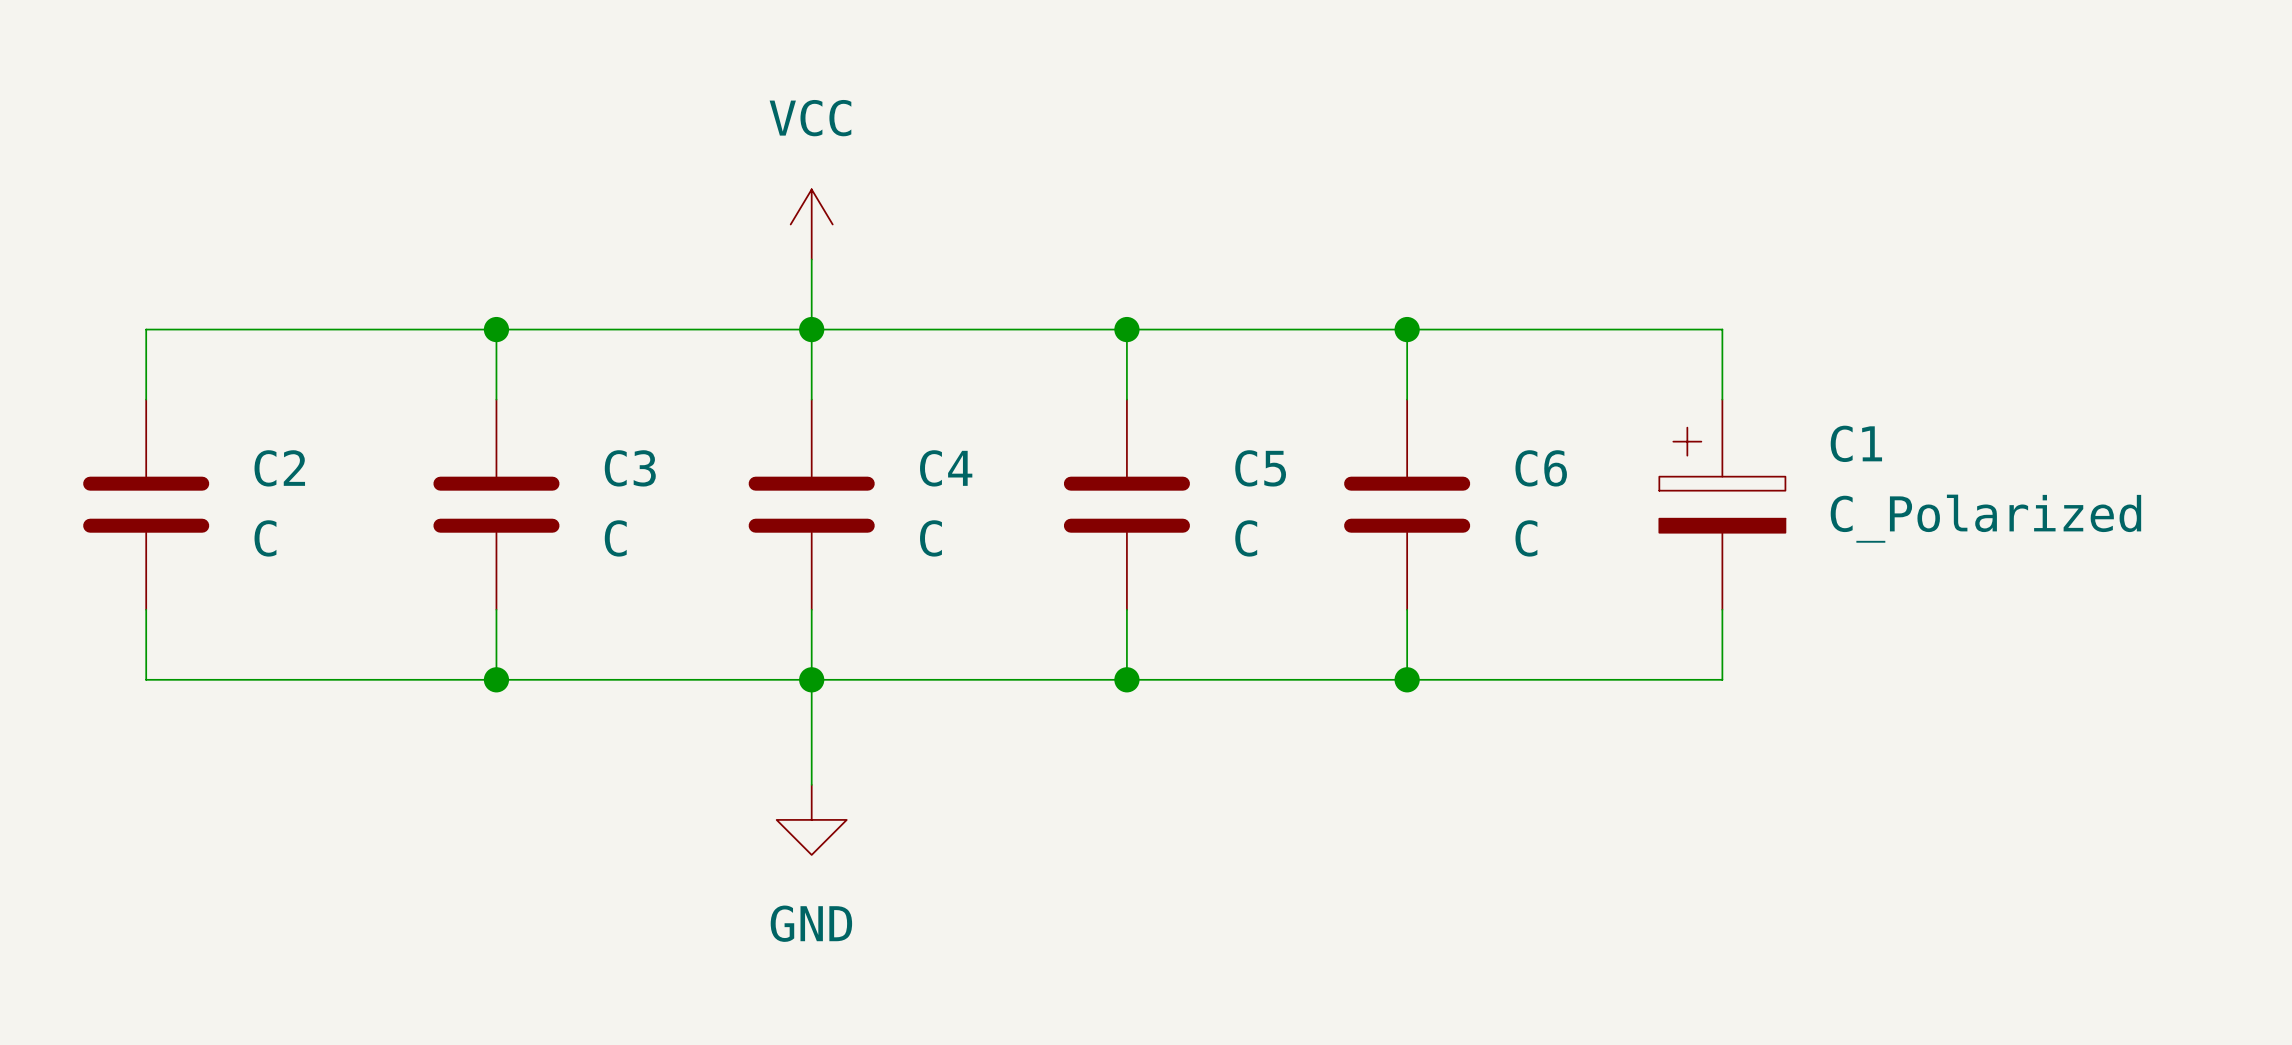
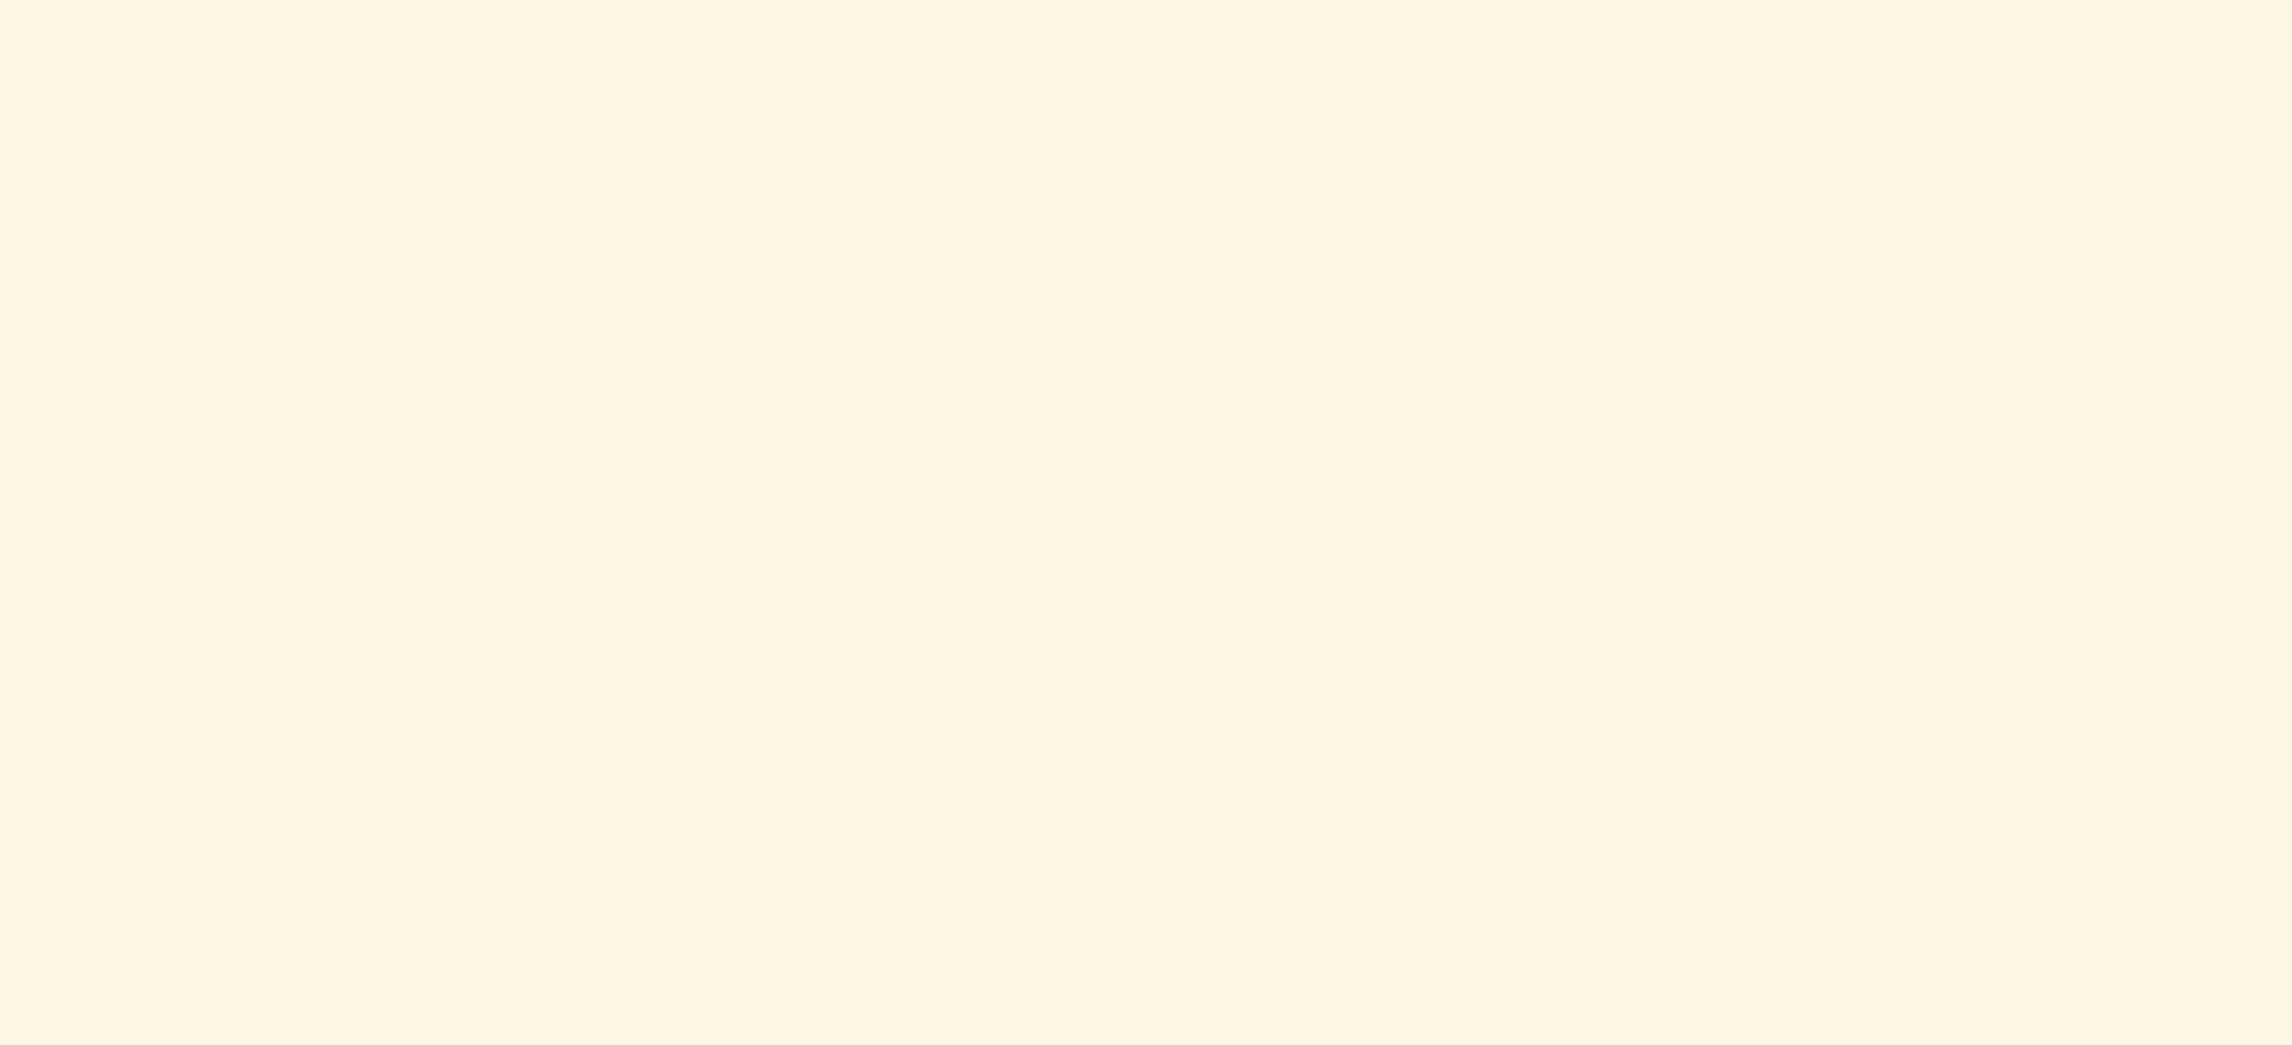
power symbol: VCC (811, 224) -> none
wire: (811, 259) (811, 399) -> none
wire: (496, 329) (496, 399) -> none
junction: (496, 329) -> none
junction: (811, 329) -> none
wire: (1126, 329) (1126, 399) -> none
junction: (1126, 329) -> none
wire: (1407, 329) (1407, 399) -> none
junction: (1407, 329) -> none
wire: (146, 399) (146, 329) (1722, 329) (1722, 399) -> none
C2: C (146, 504) -> none
C3: C (496, 504) -> none
C4: C (811, 504) -> none
C5: C (1126, 504) -> none
C6: C (1407, 504) -> none
C1: C_Polarized (1722, 504) -> none
wire: (146, 609) (146, 679) (1722, 679) (1722, 609) -> none
wire: (496, 609) (496, 679) -> none
wire: (811, 609) (811, 784) -> none
wire: (1126, 609) (1126, 679) -> none
wire: (1407, 609) (1407, 679) -> none
junction: (496, 679) -> none
junction: (811, 679) -> none
junction: (1126, 679) -> none
junction: (1407, 679) -> none
power symbol: GND (811, 819) -> none

